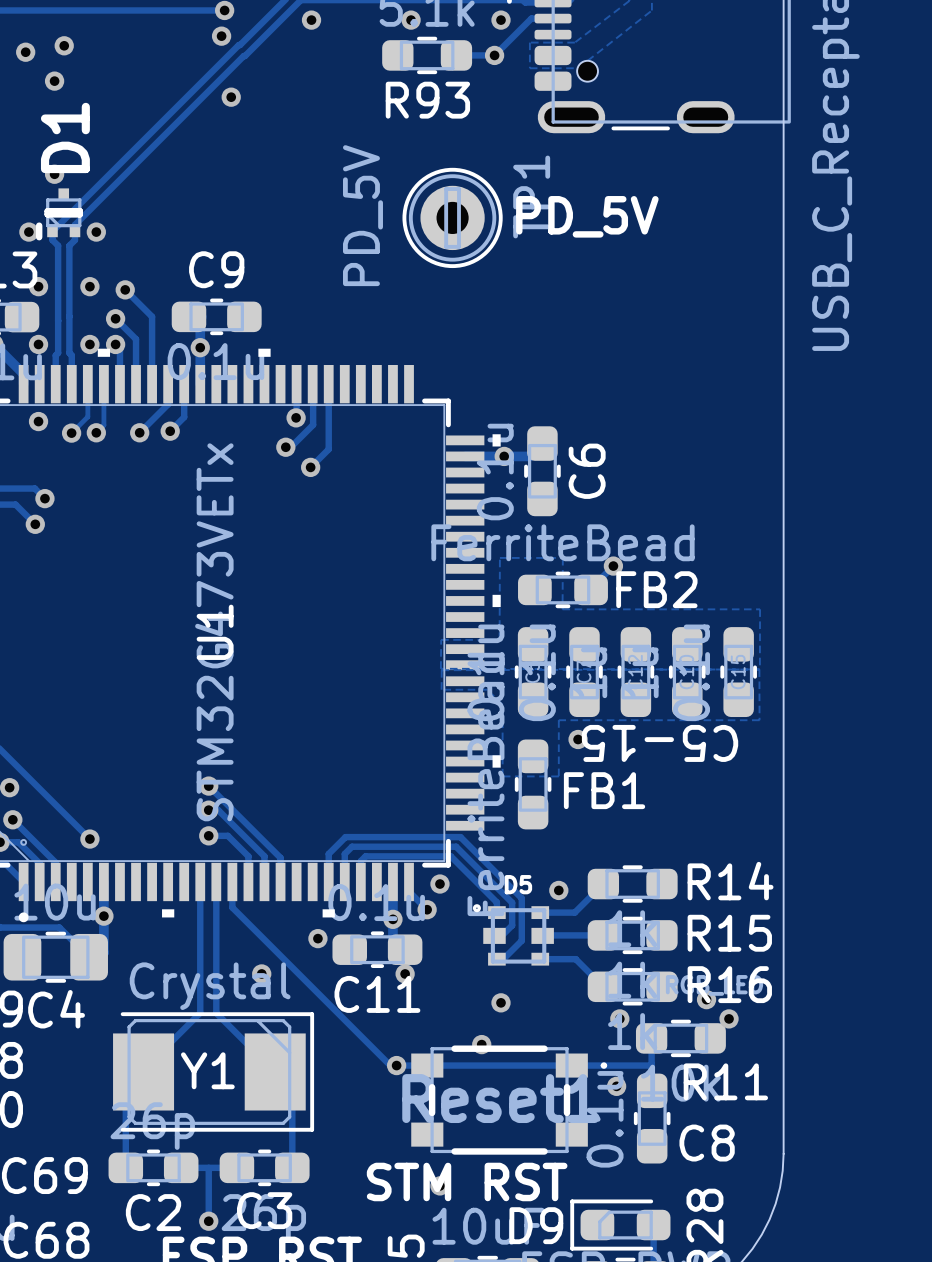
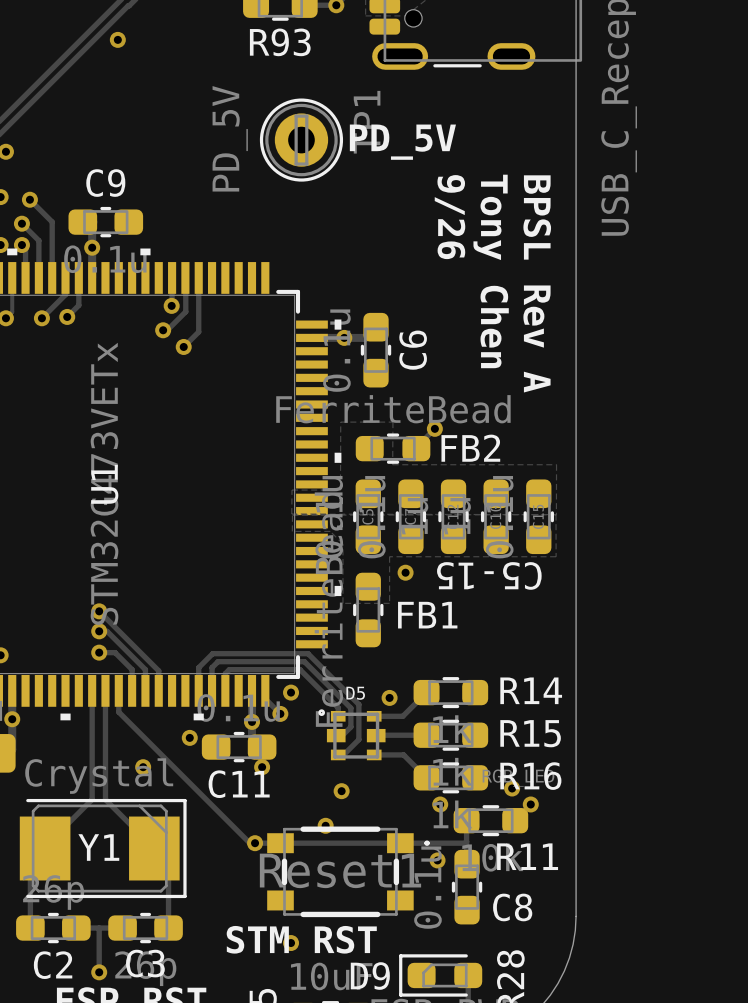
text: none -> 9/26 (450, 217)
text: none -> Tony Chen (491, 271)
text: none -> BPSL Rev A (537, 283)

